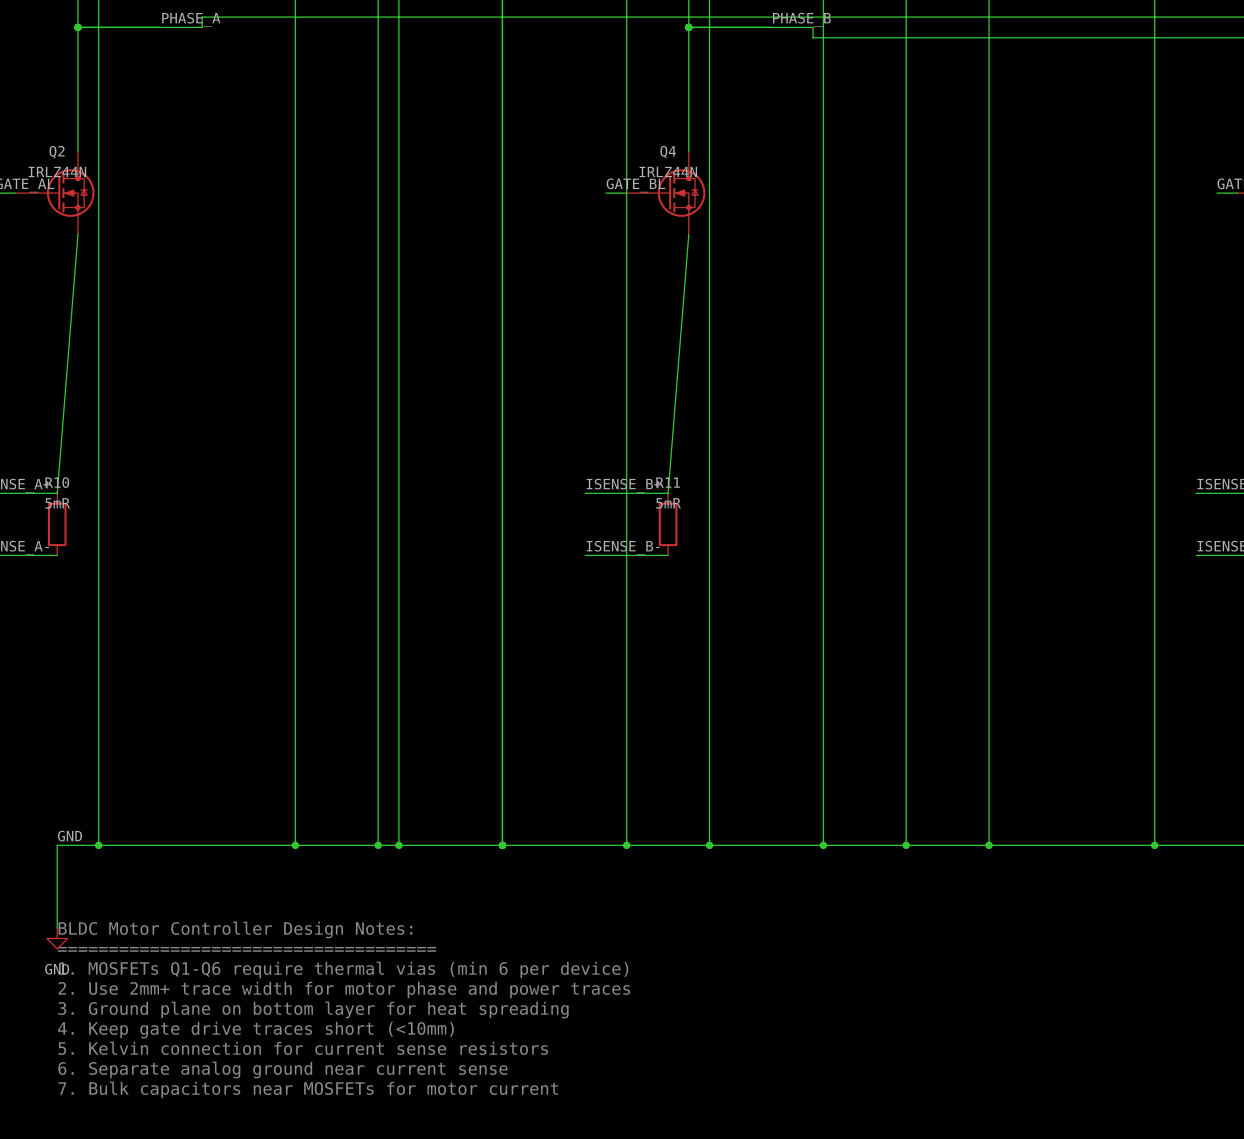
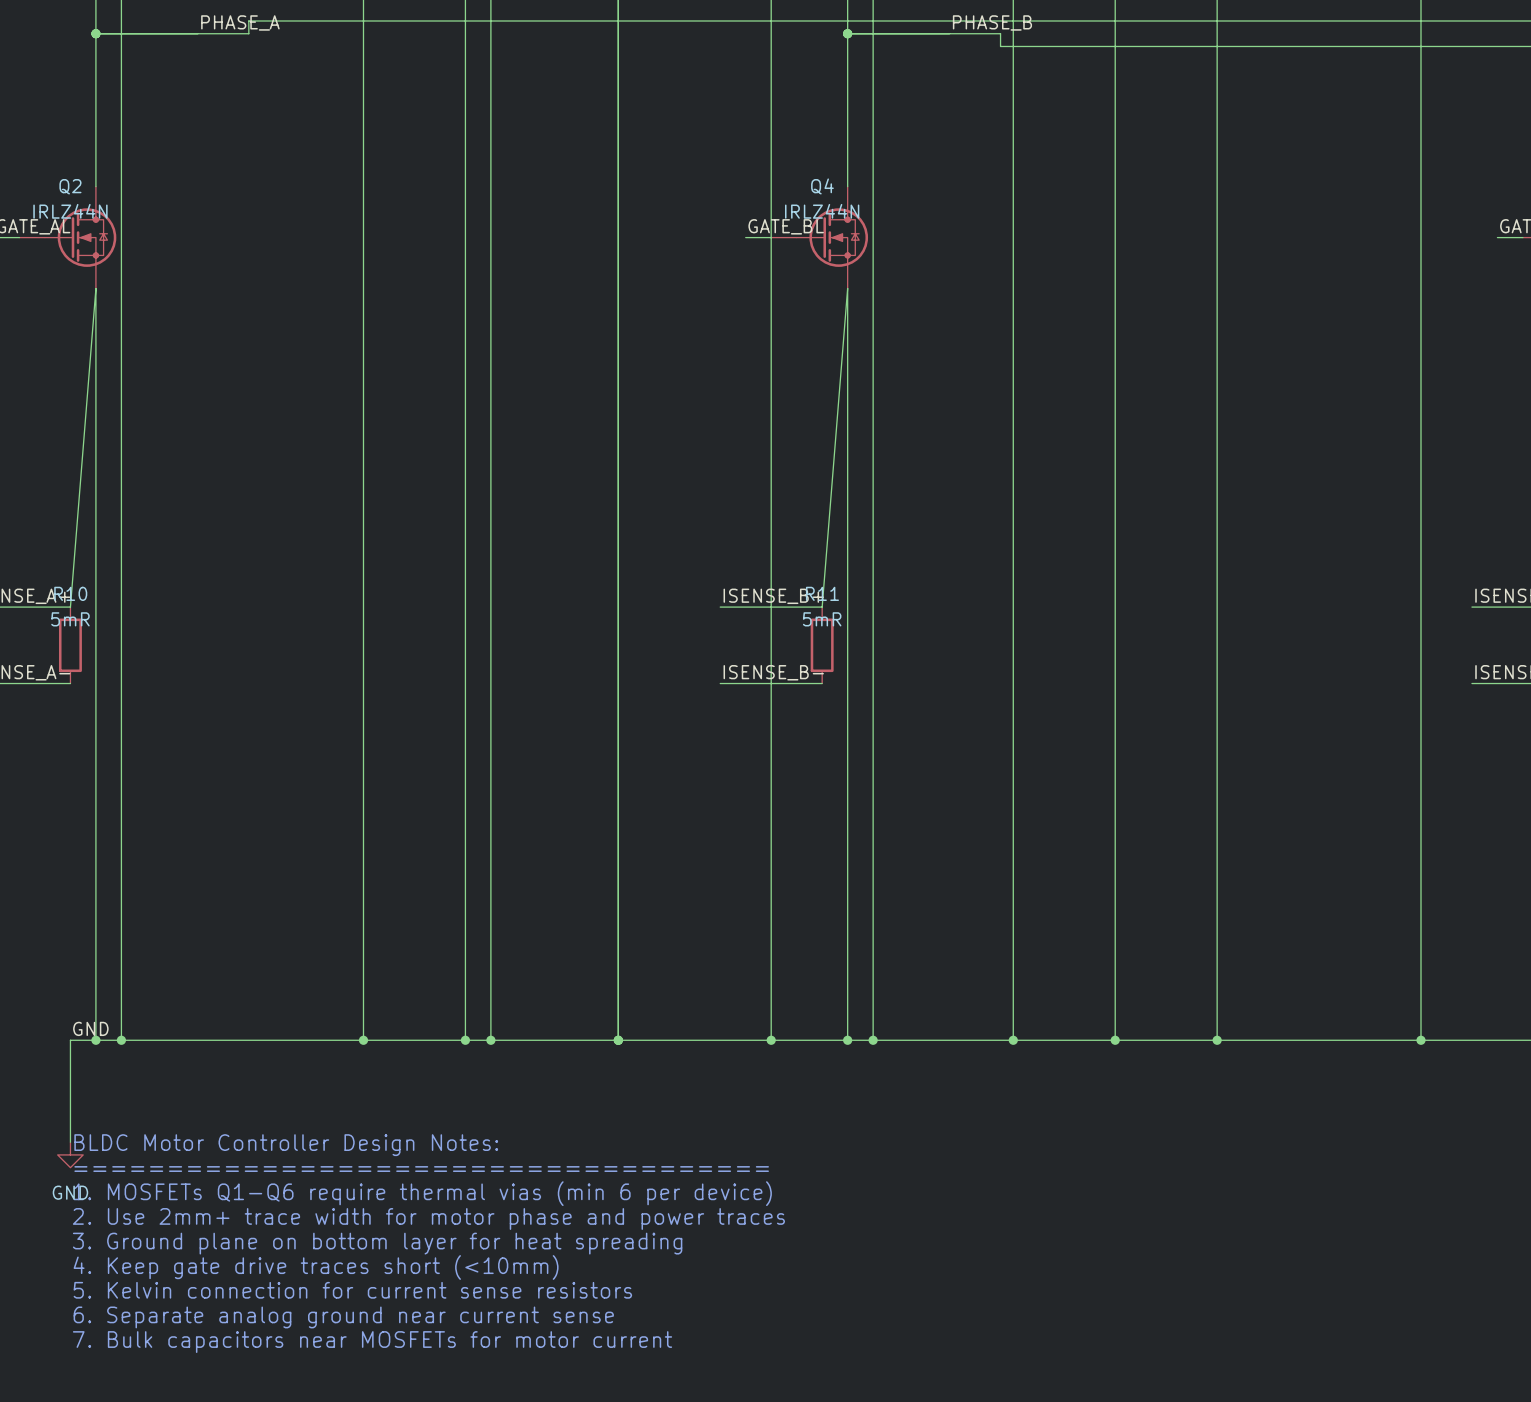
wire: none -> (95, 288) (95, 1040)
wire: none -> (847, 288) (847, 1040)
junction: none -> (95, 1040)
junction: none -> (847, 1040)

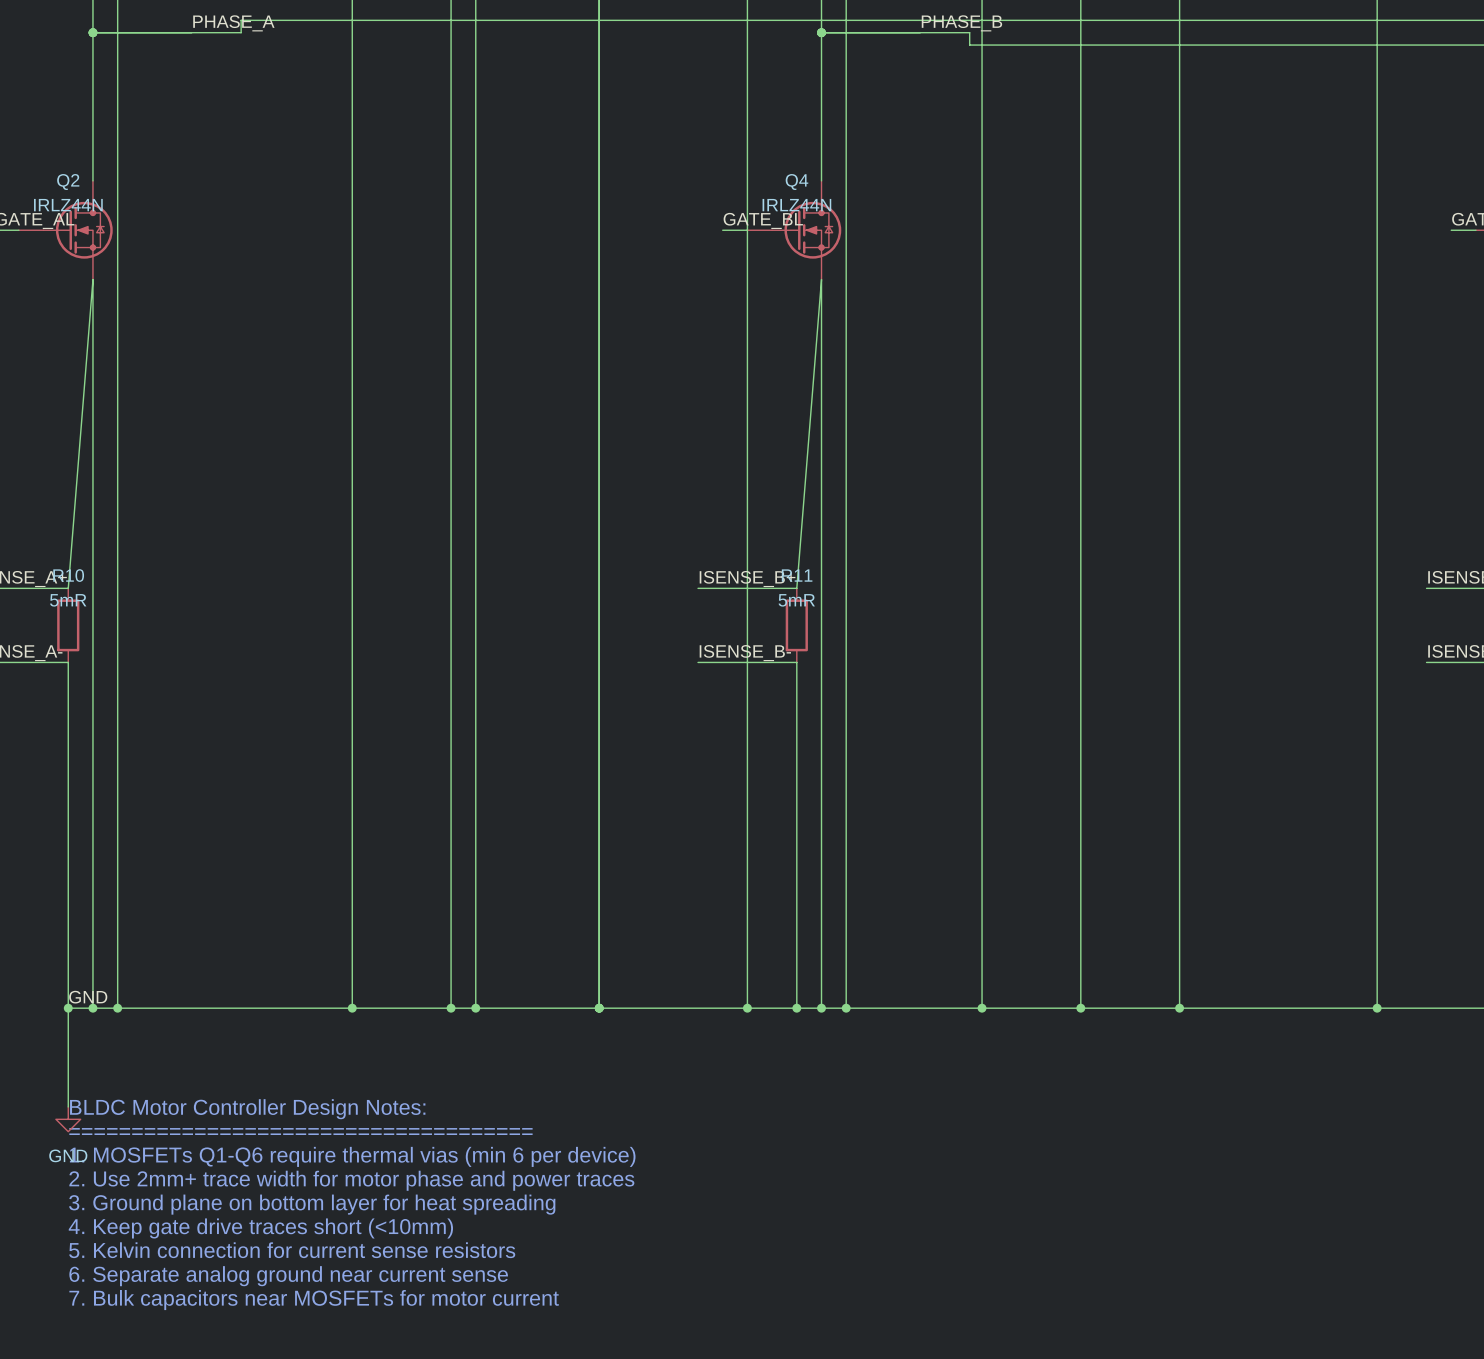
wire: none -> (68, 662) (68, 1008)
wire: none -> (796, 662) (796, 1008)
junction: none -> (68, 1008)
junction: none -> (796, 1008)

